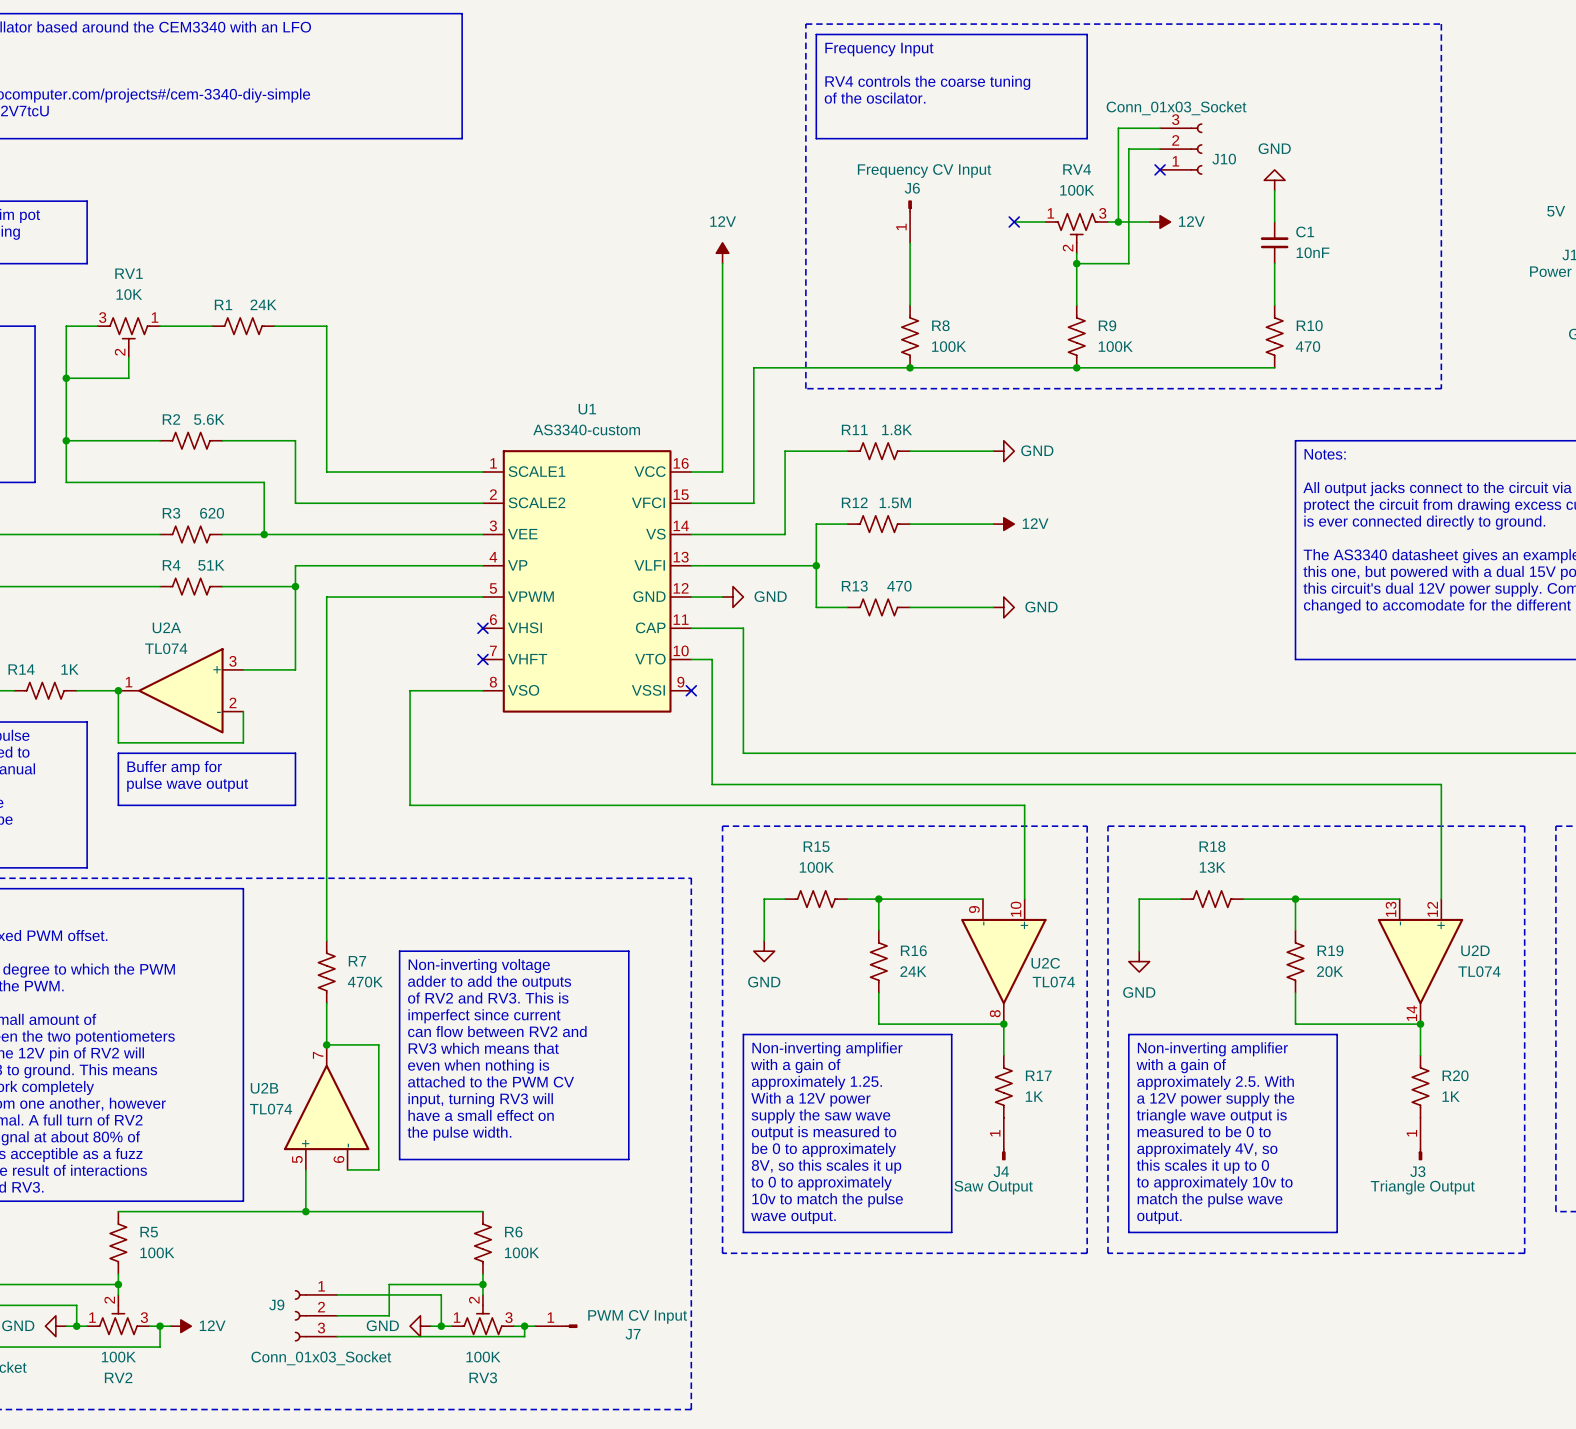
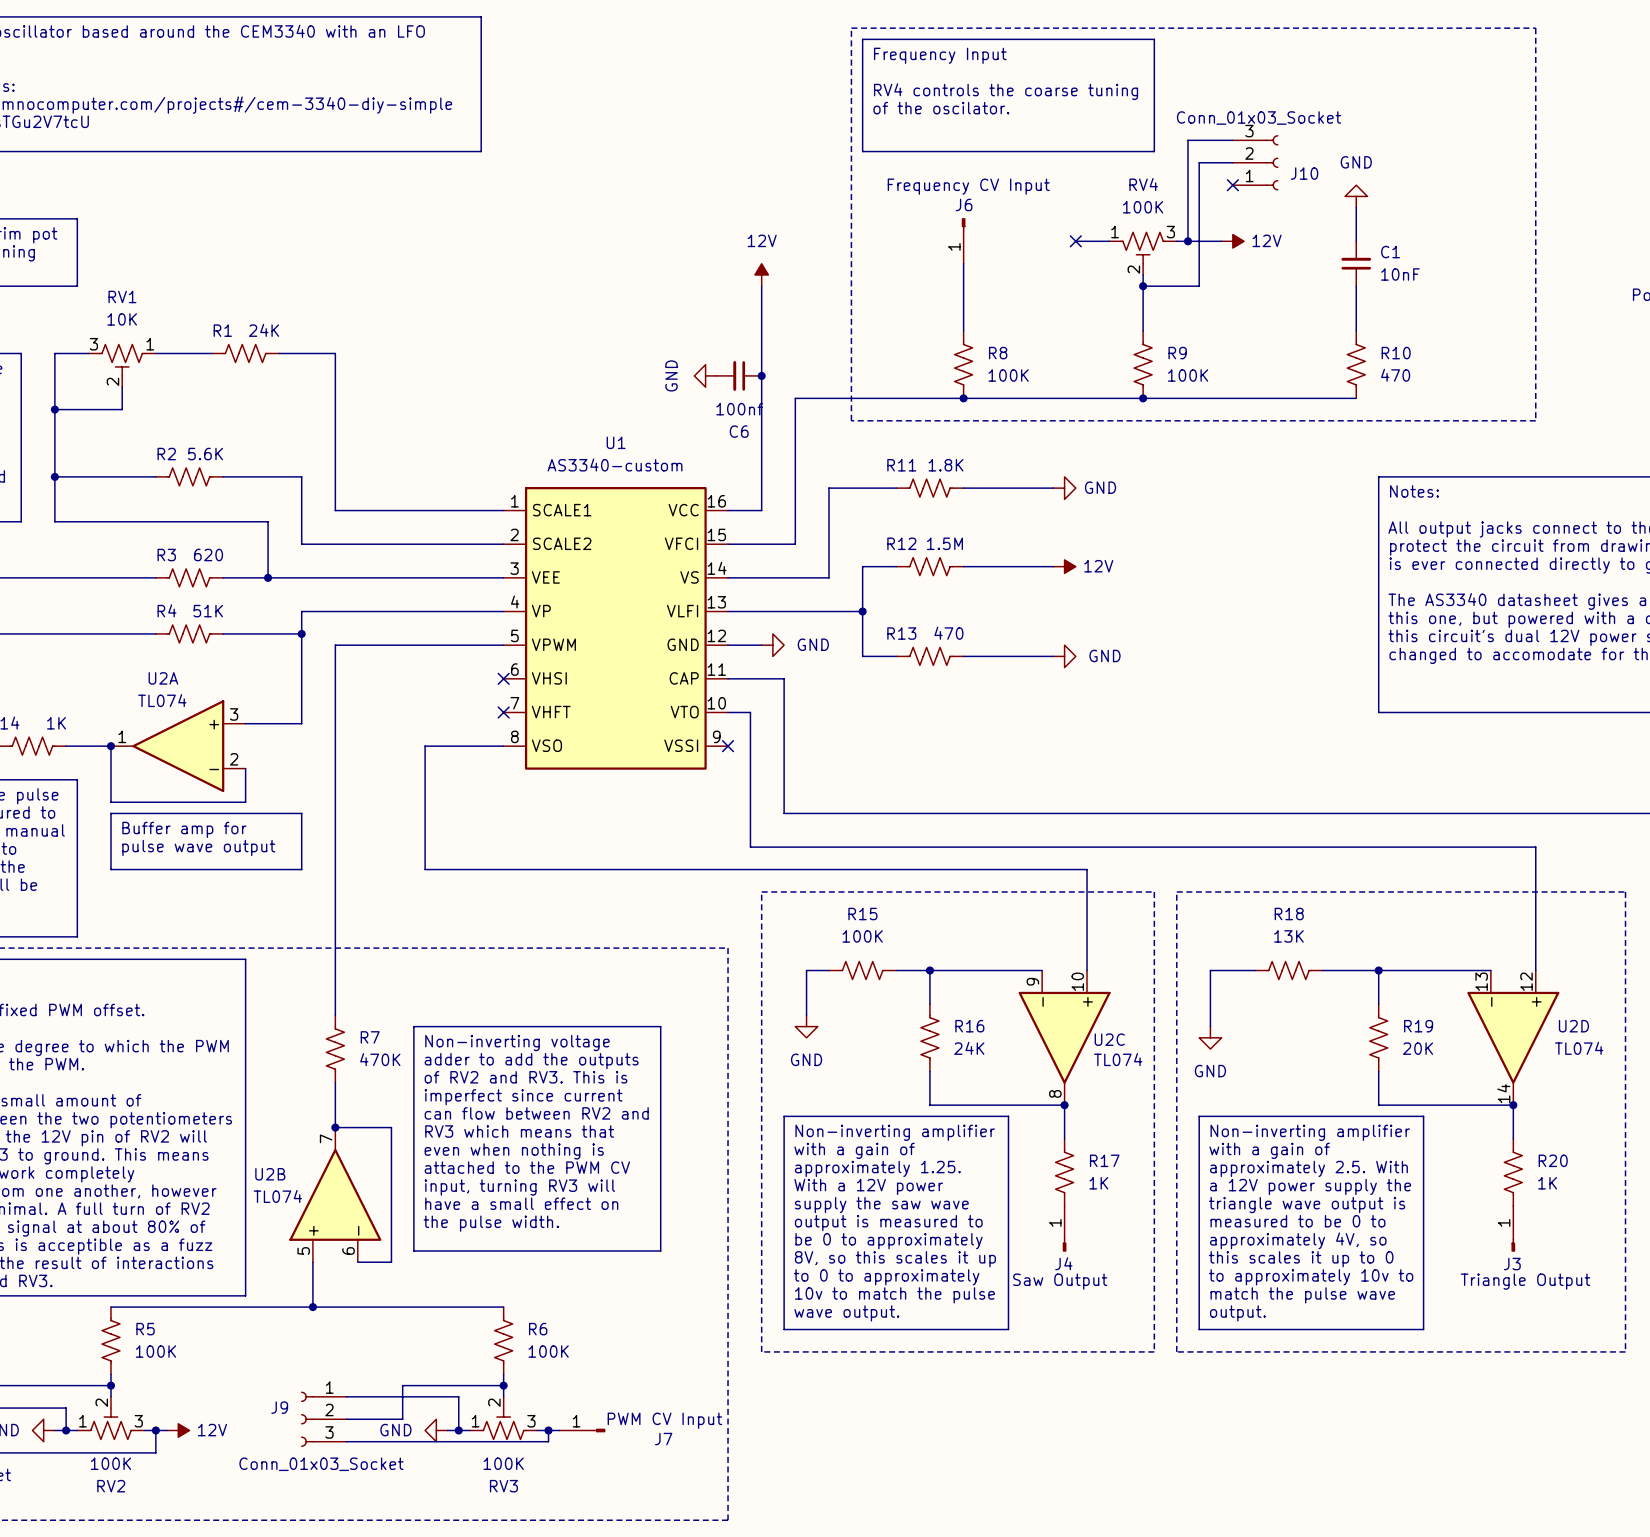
power symbol: none -> GND (705, 375)
C6: none -> 100nf (739, 375)
junction: none -> (761, 375)

